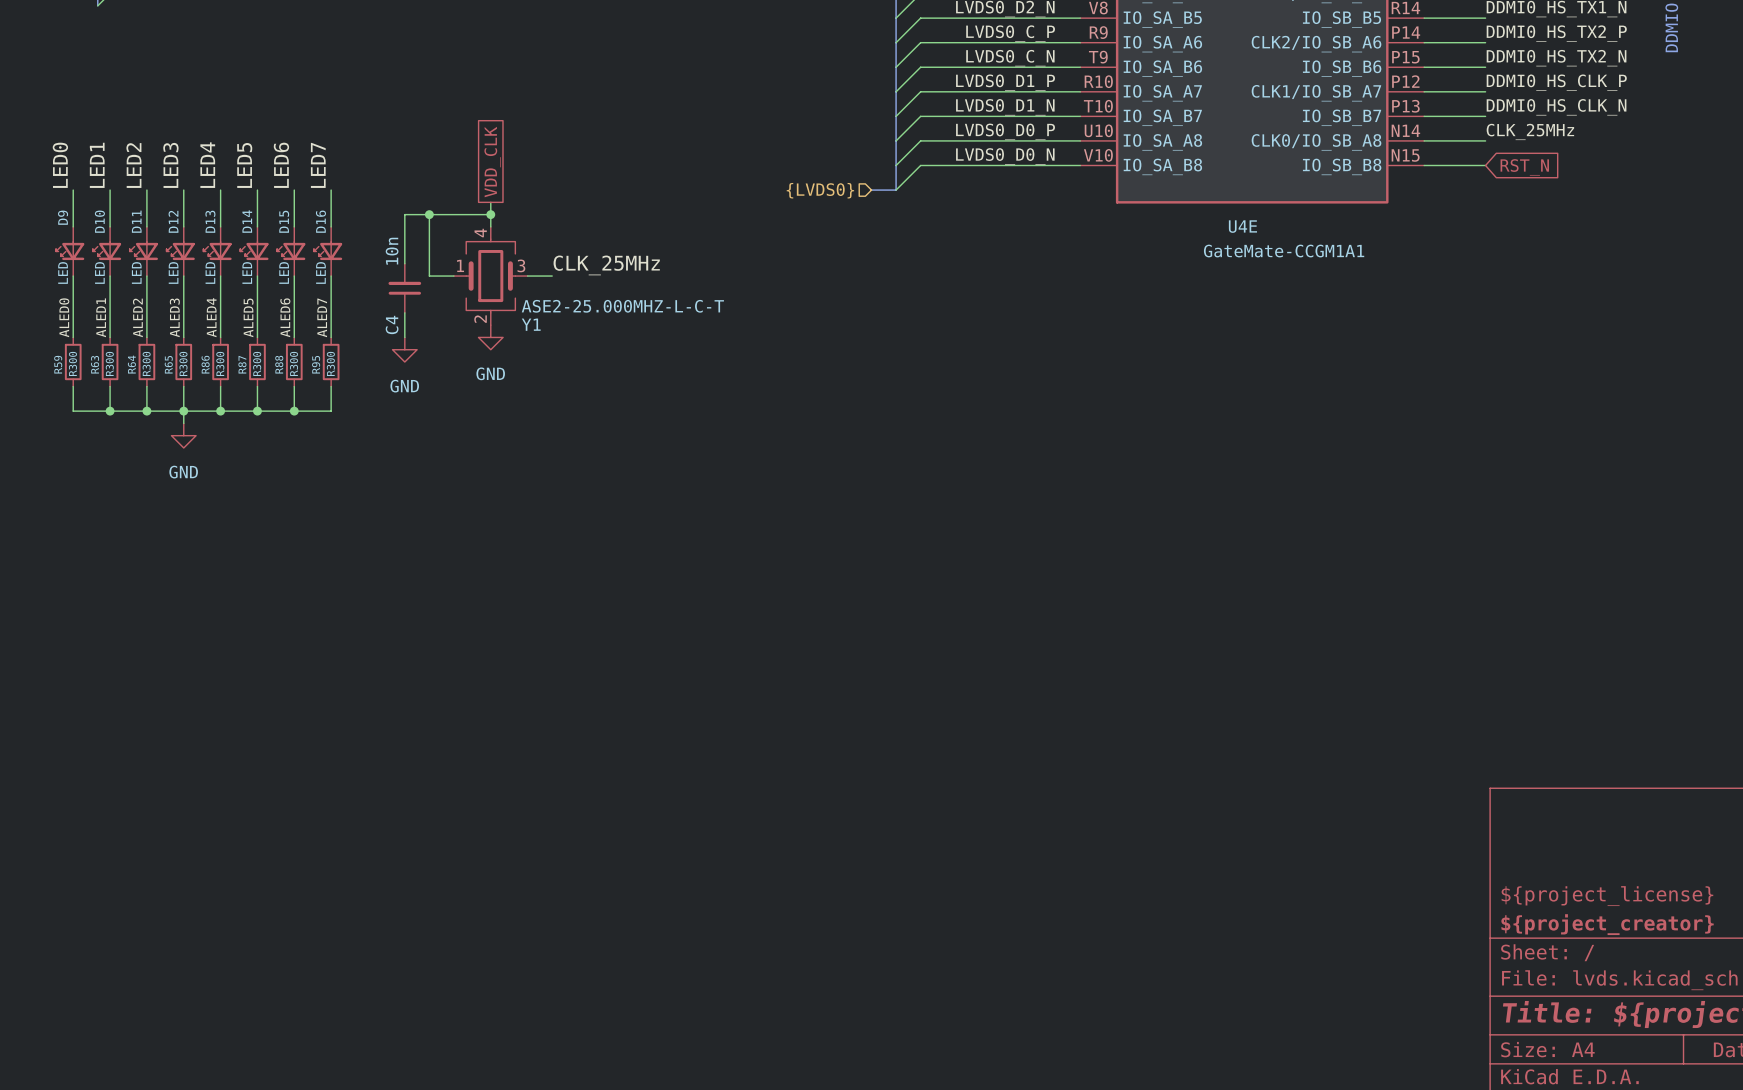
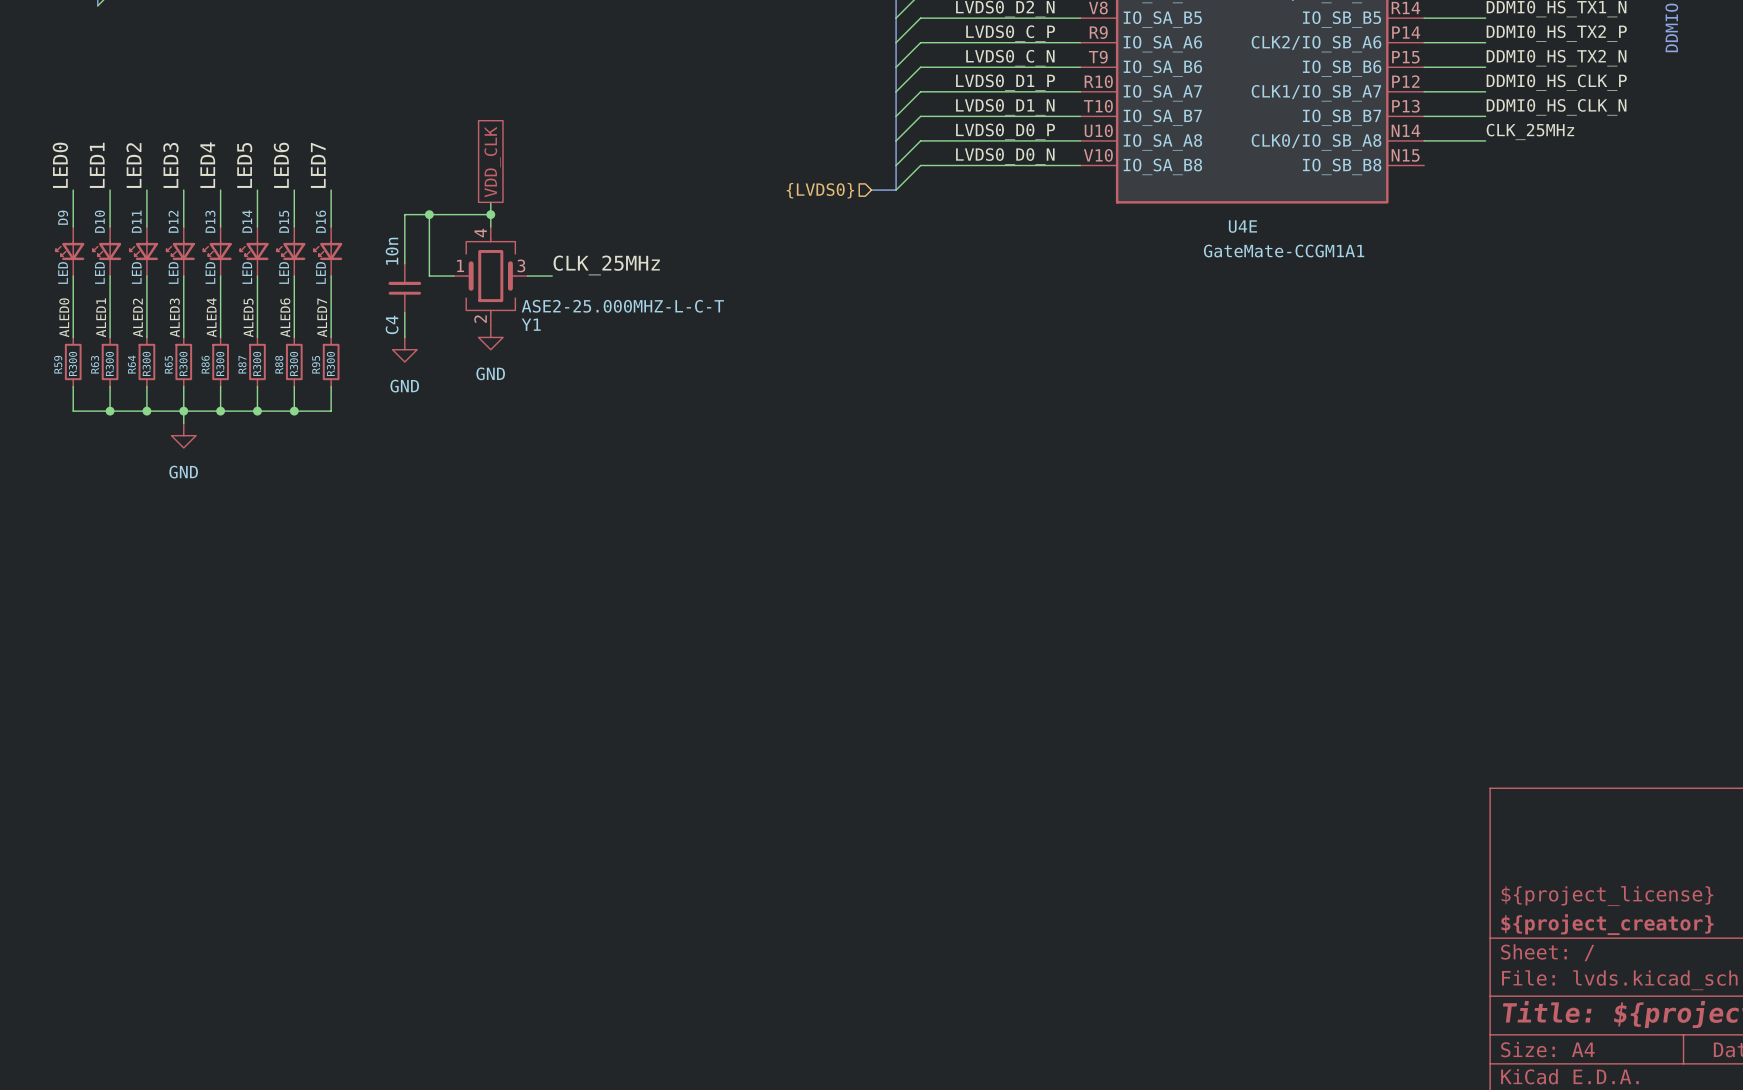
wire: (1424, 165) (1485, 165) -> none
global label: RST_N (1524, 167) -> none

